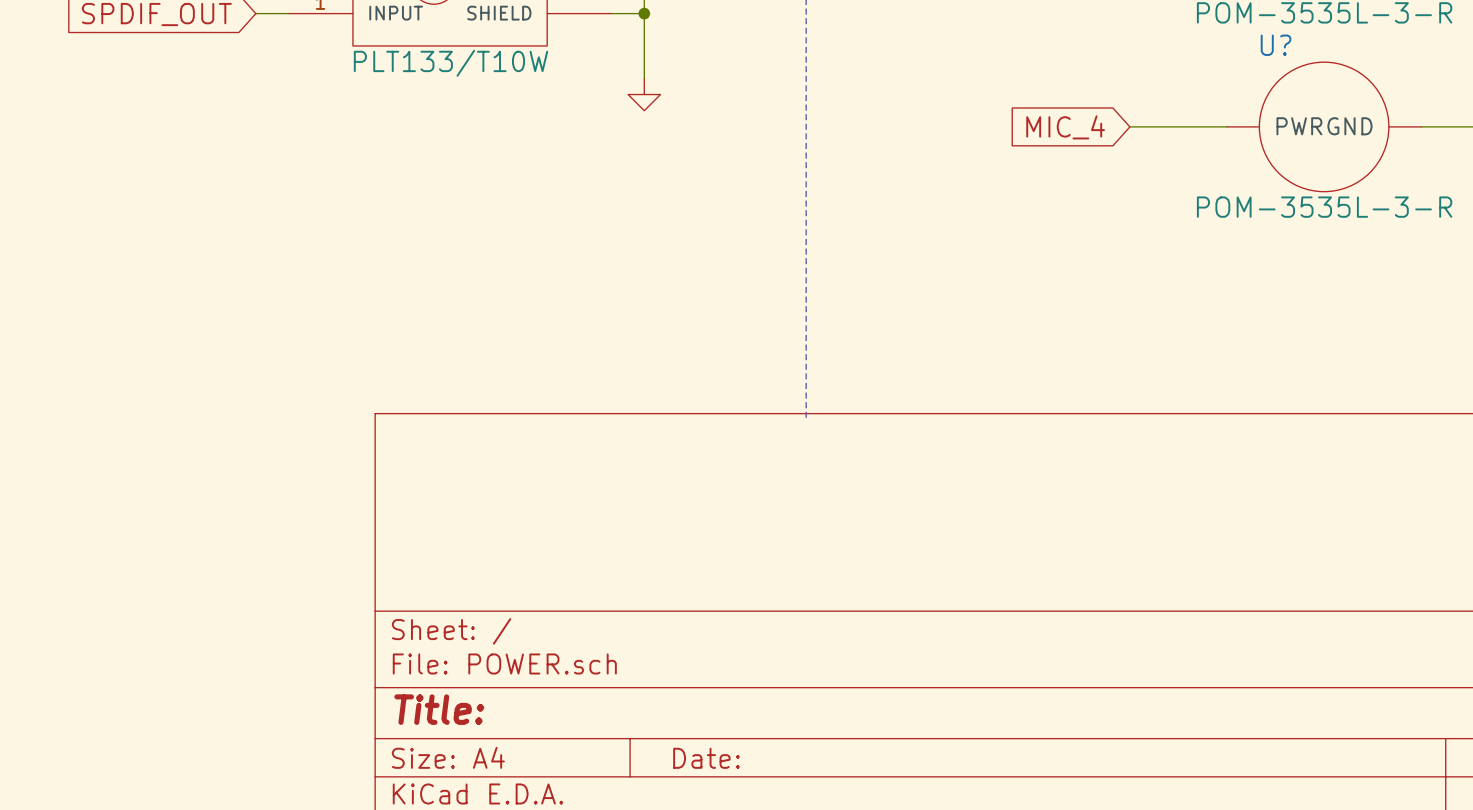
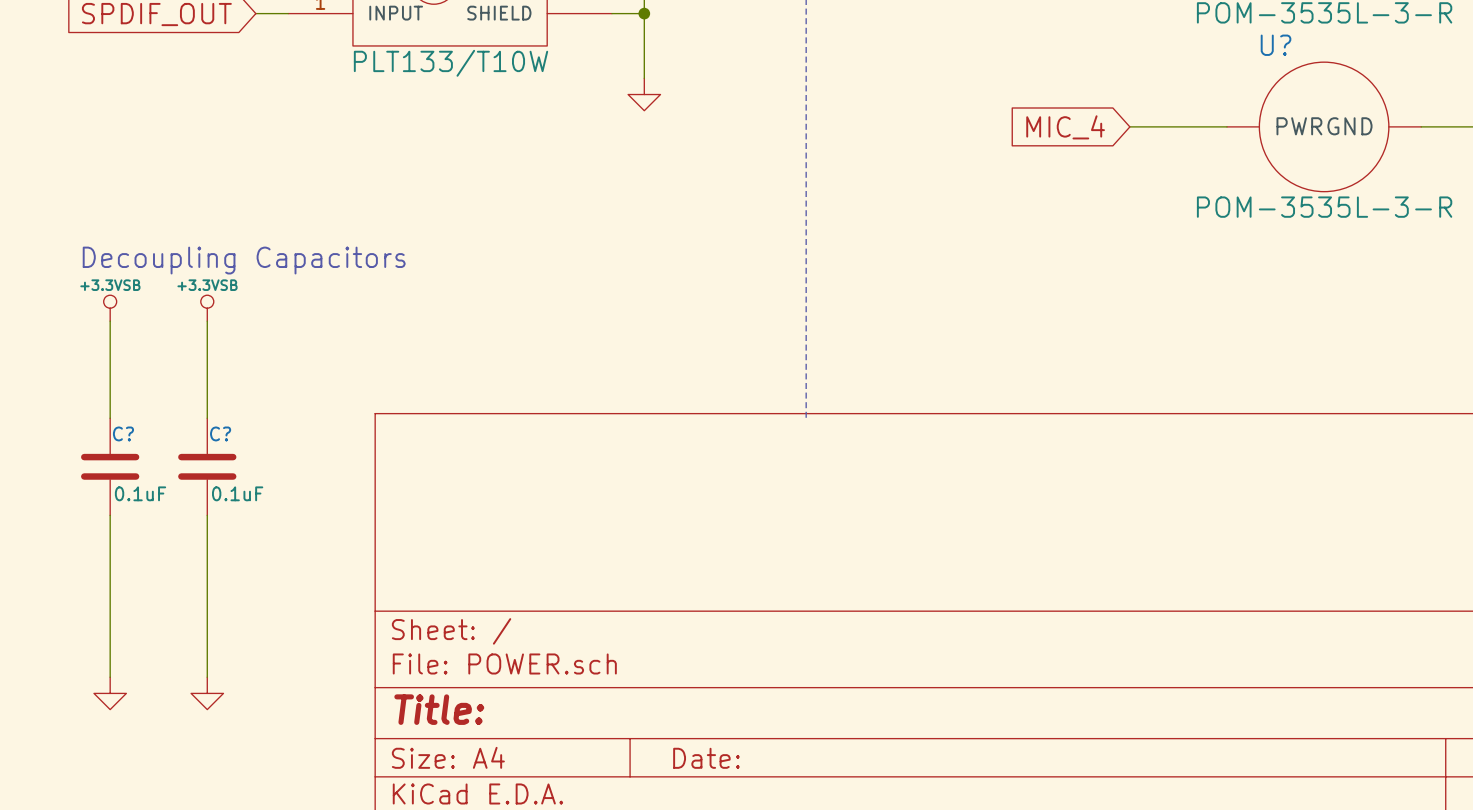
text: none -> Decoupling Capacitors (244, 260)
power symbol: none -> +3.3VSB (110, 308)
power symbol: none -> +3.3VSB (207, 308)
wire: none -> (110, 321) (110, 418)
wire: none -> (207, 321) (207, 418)
C?: none -> 0.1uF (110, 466)
C?: none -> 0.1uF (207, 466)
wire: none -> (110, 515) (110, 677)
wire: none -> (207, 515) (207, 677)
power symbol: none -> (110, 693)
power symbol: none -> (207, 693)

